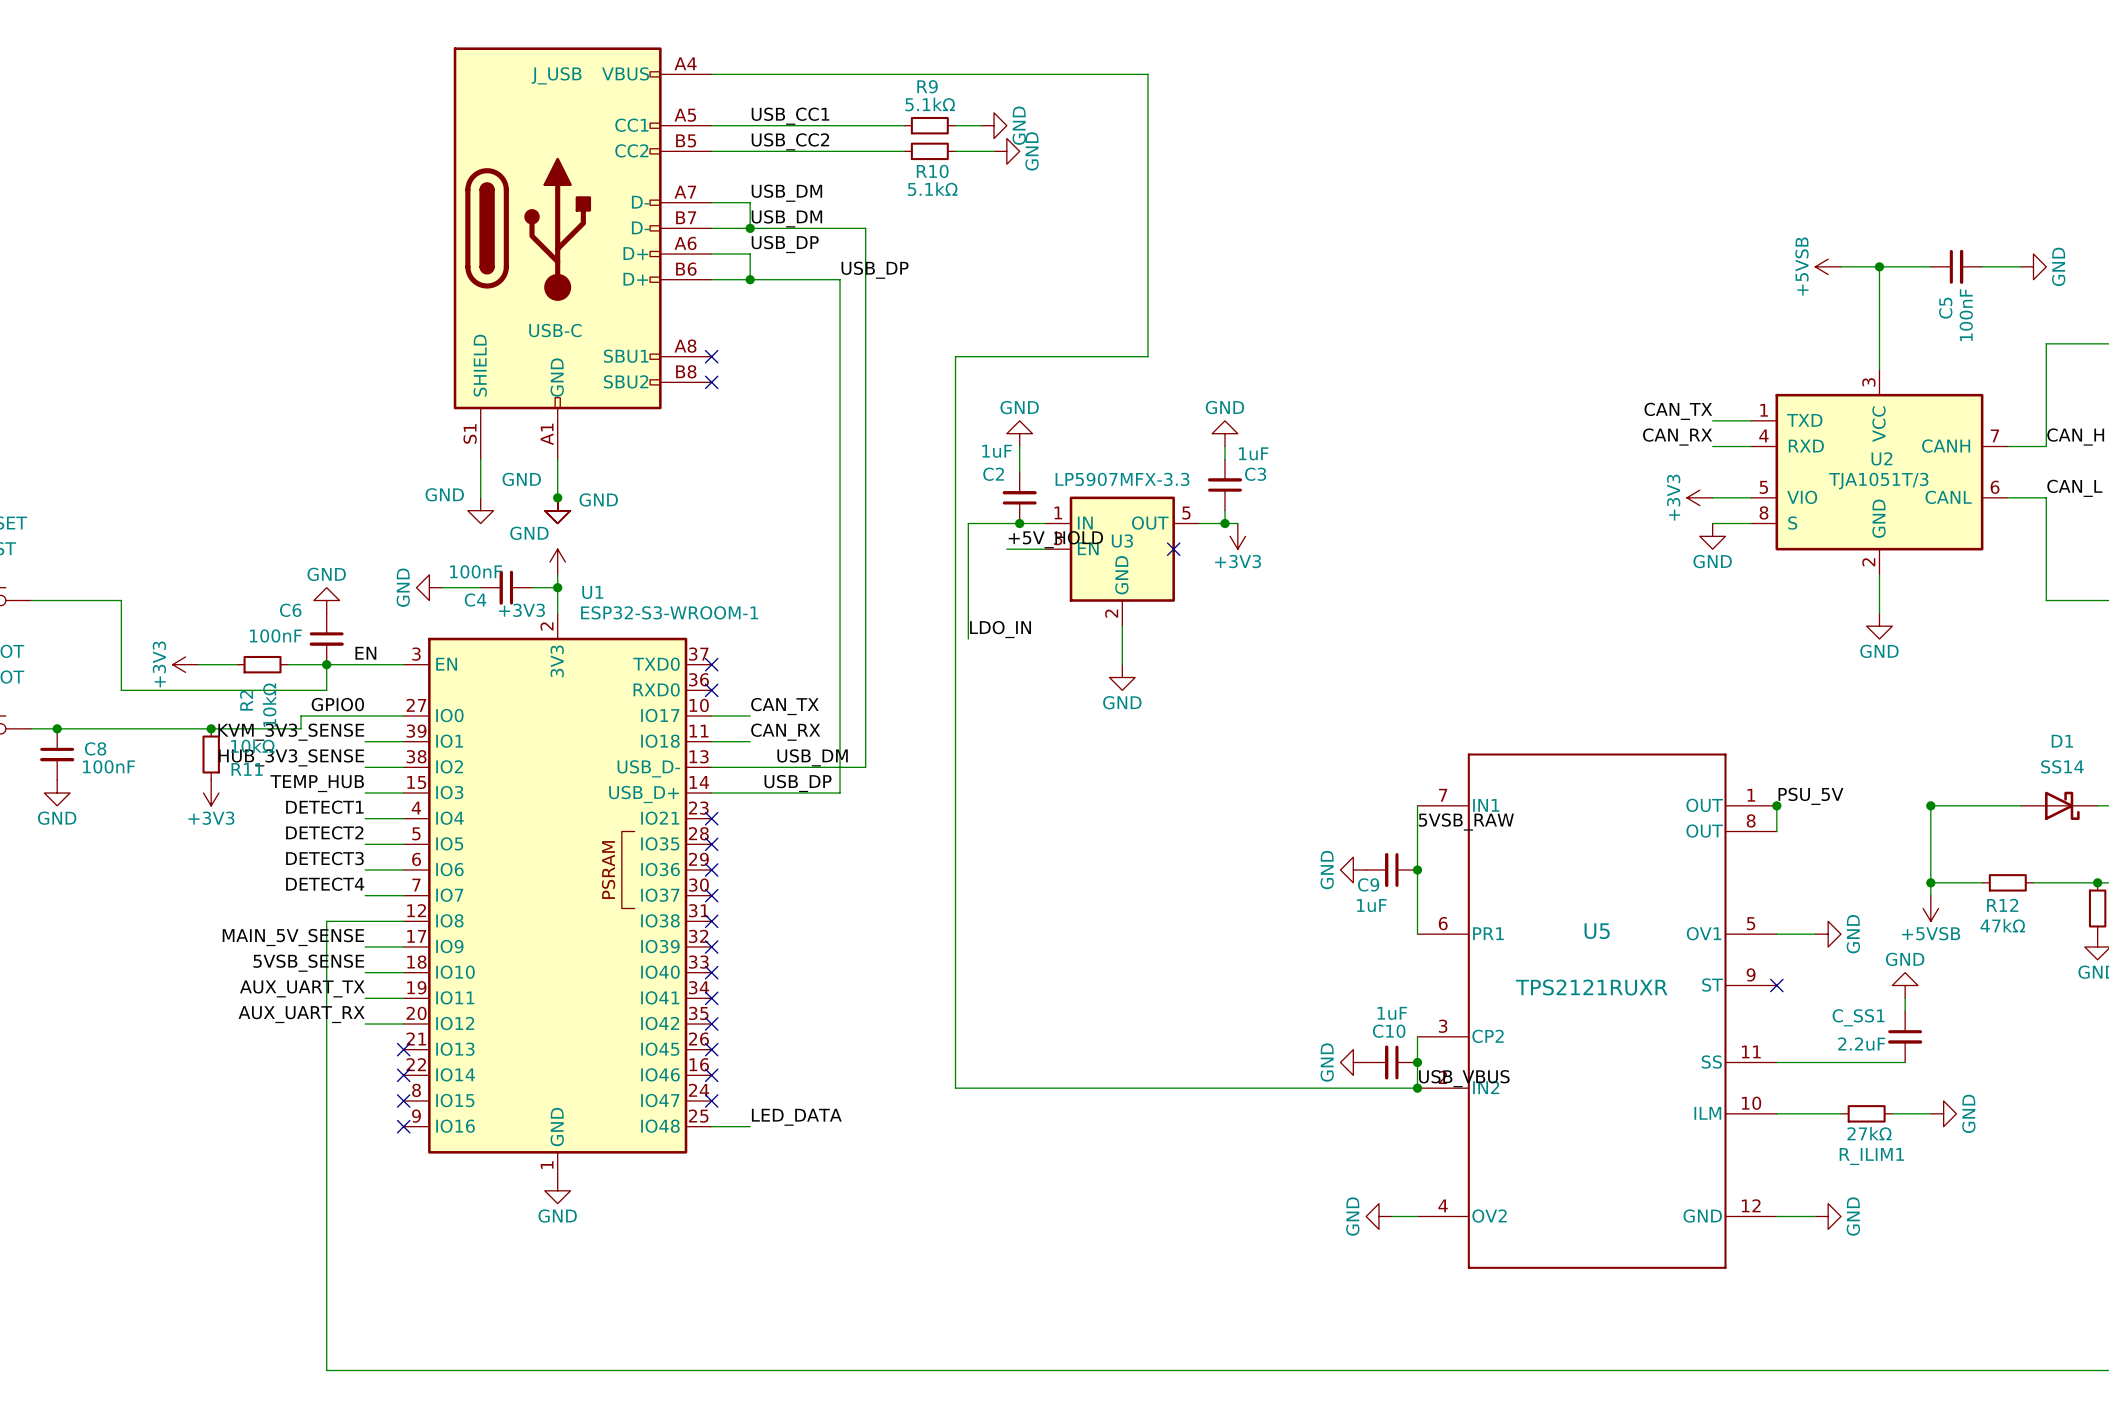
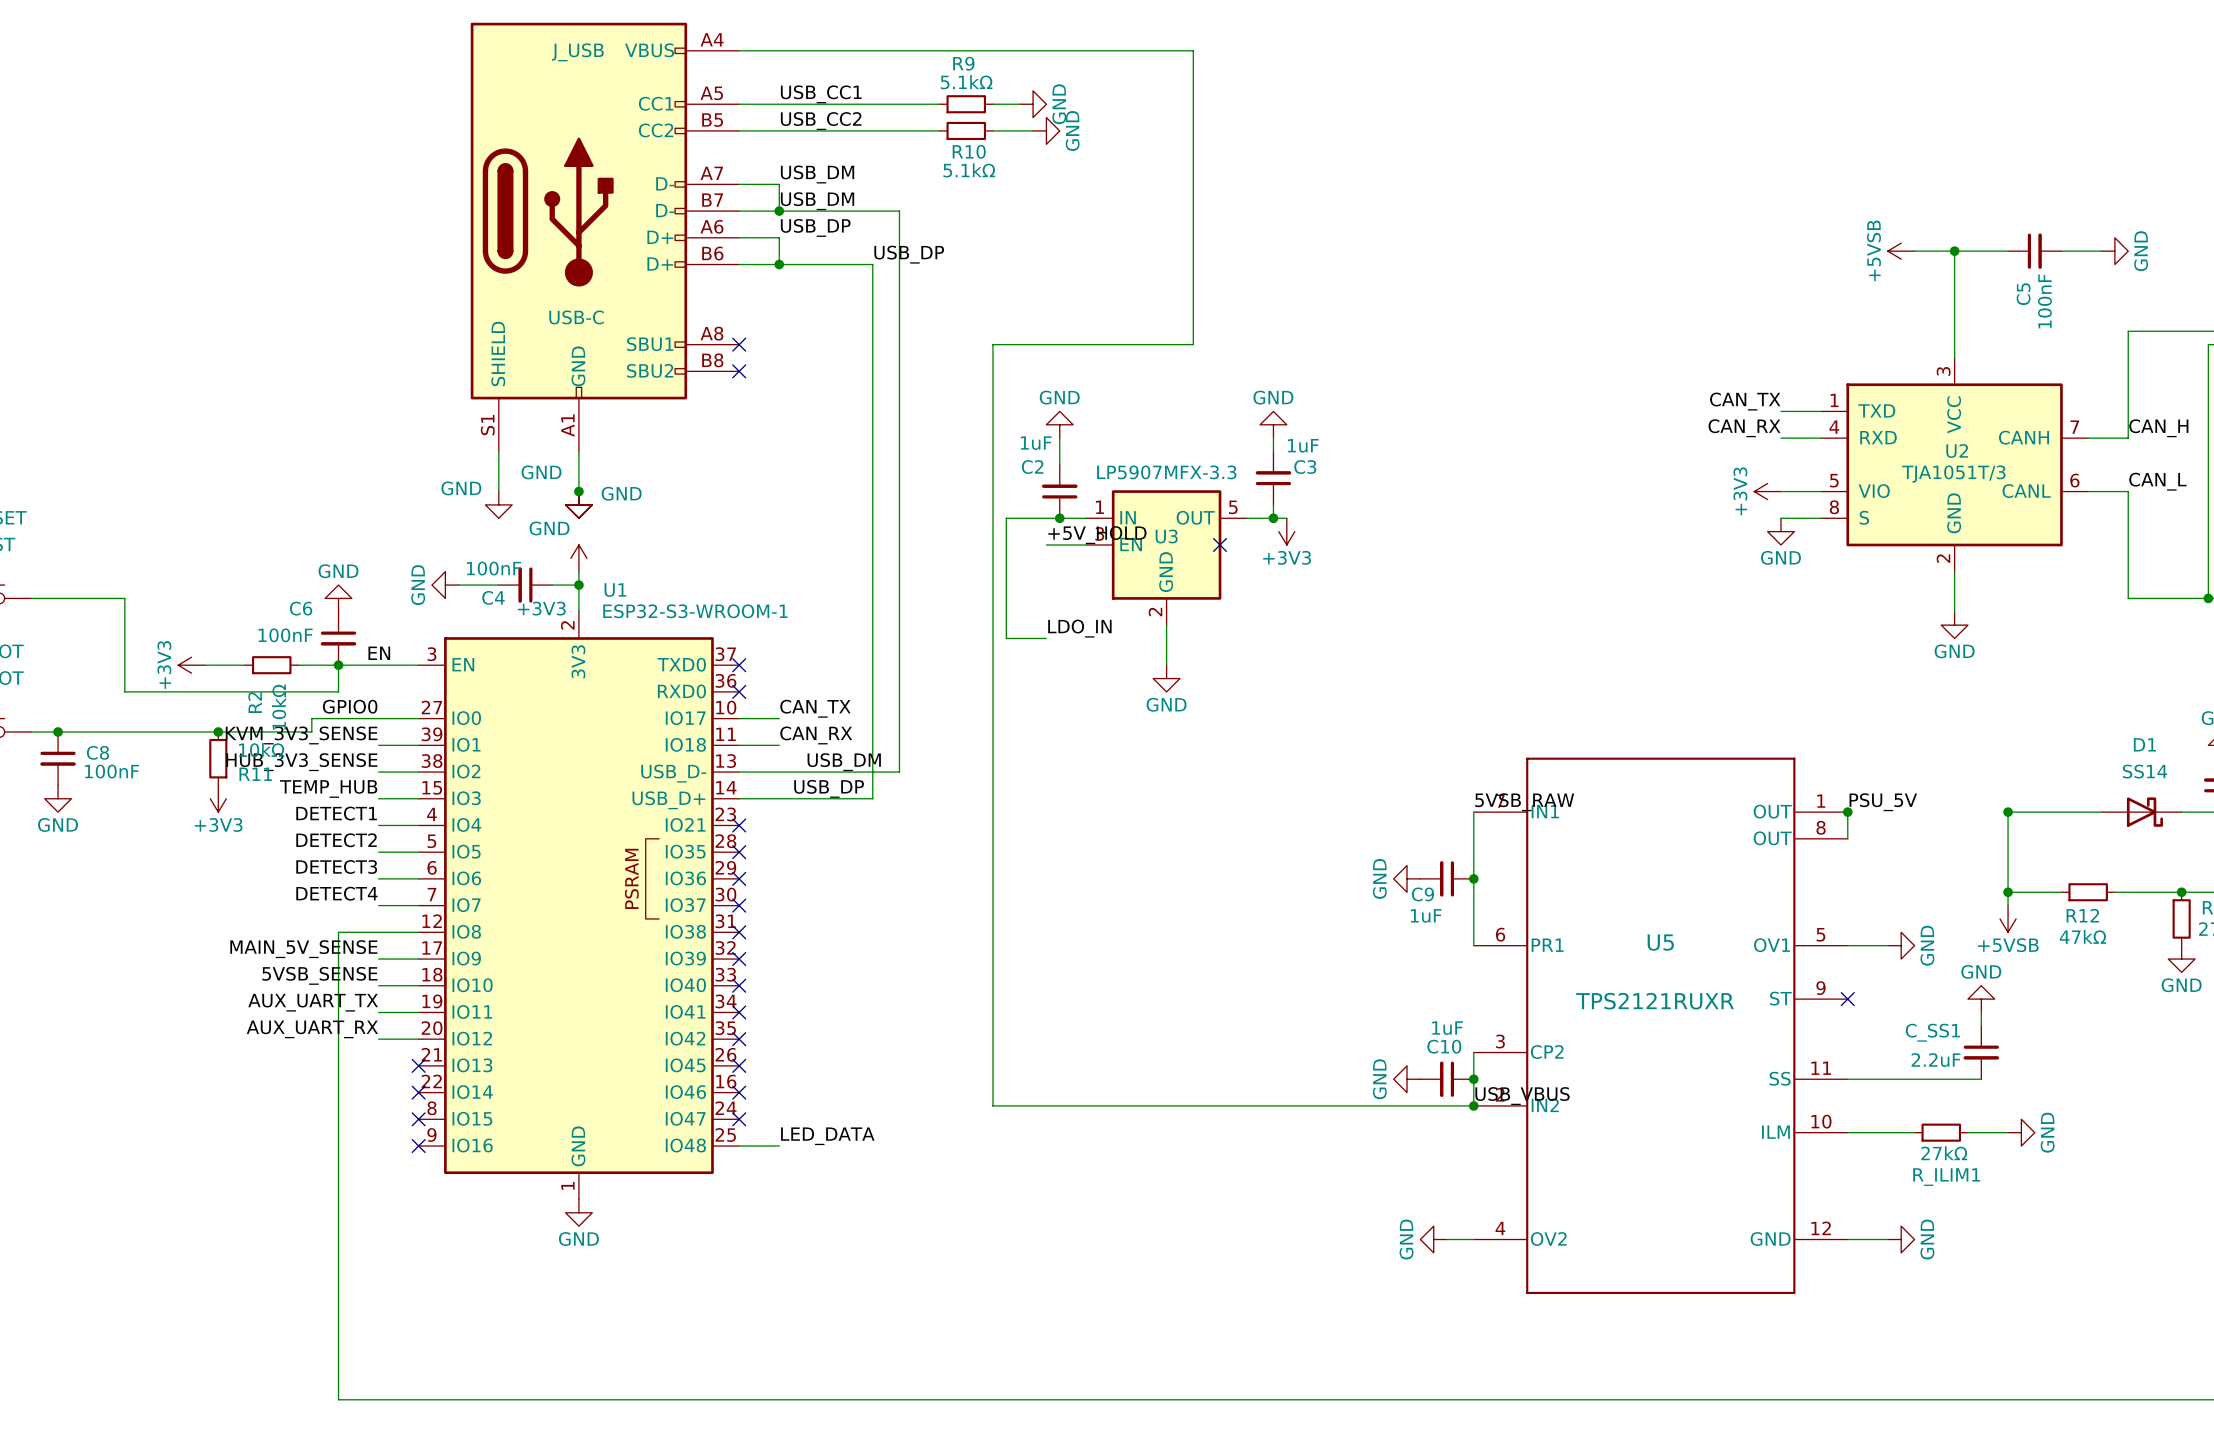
label position: LDO_IN (1000, 629) -> LDO_IN (1079, 628)
wire: none -> (1006, 638) (1046, 638)
label position: 5VSB_RAW (1466, 822) -> 5VSB_RAW (1524, 802)

